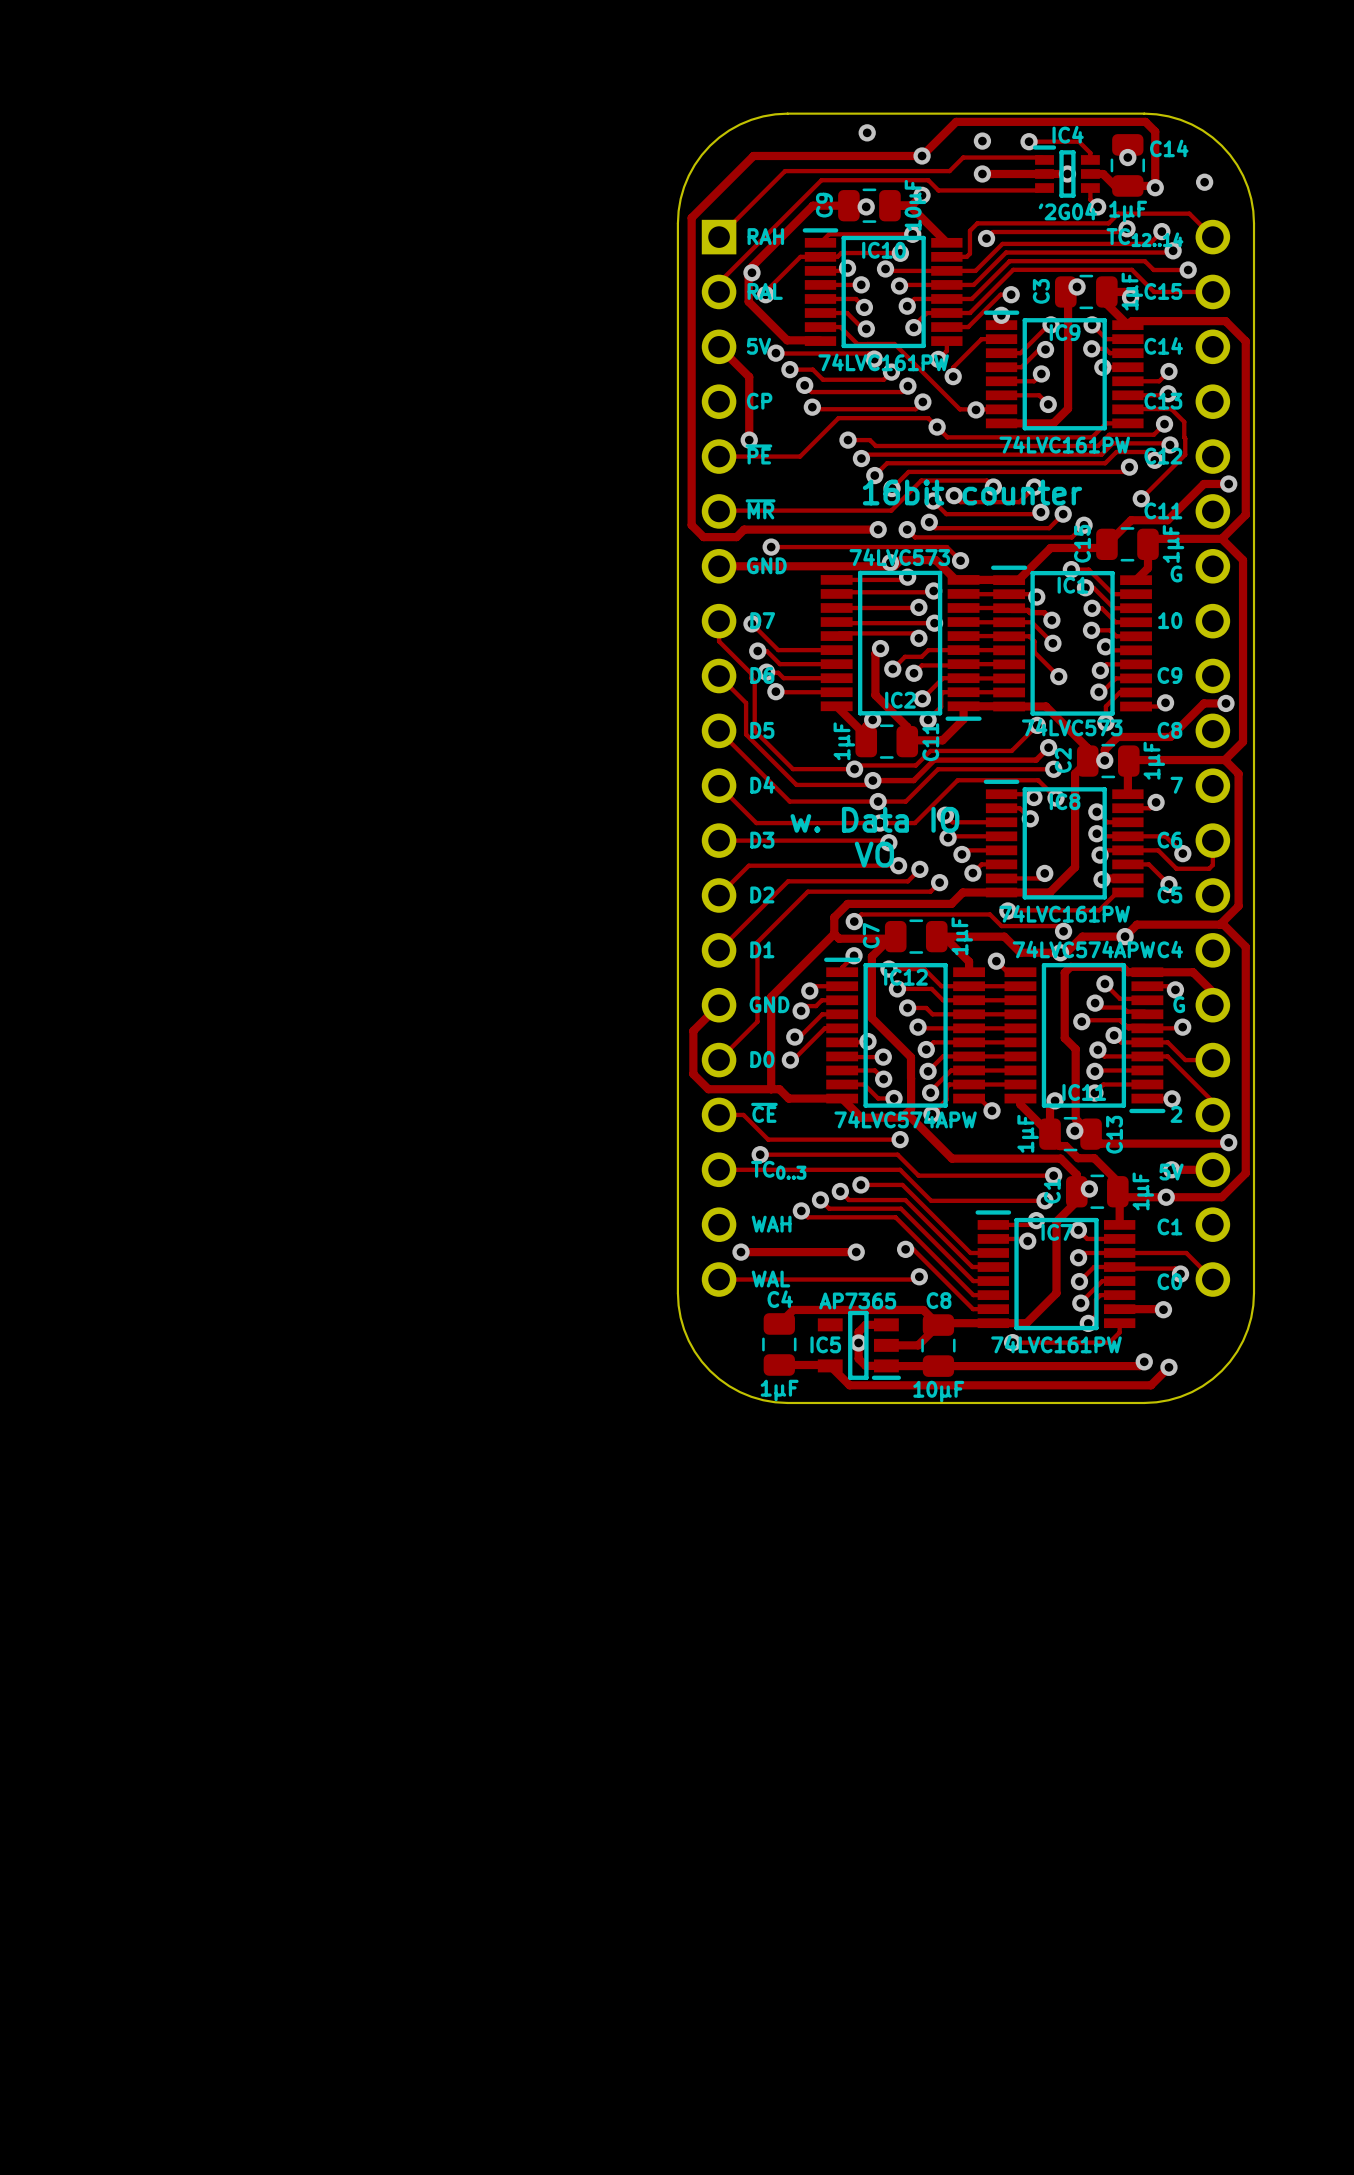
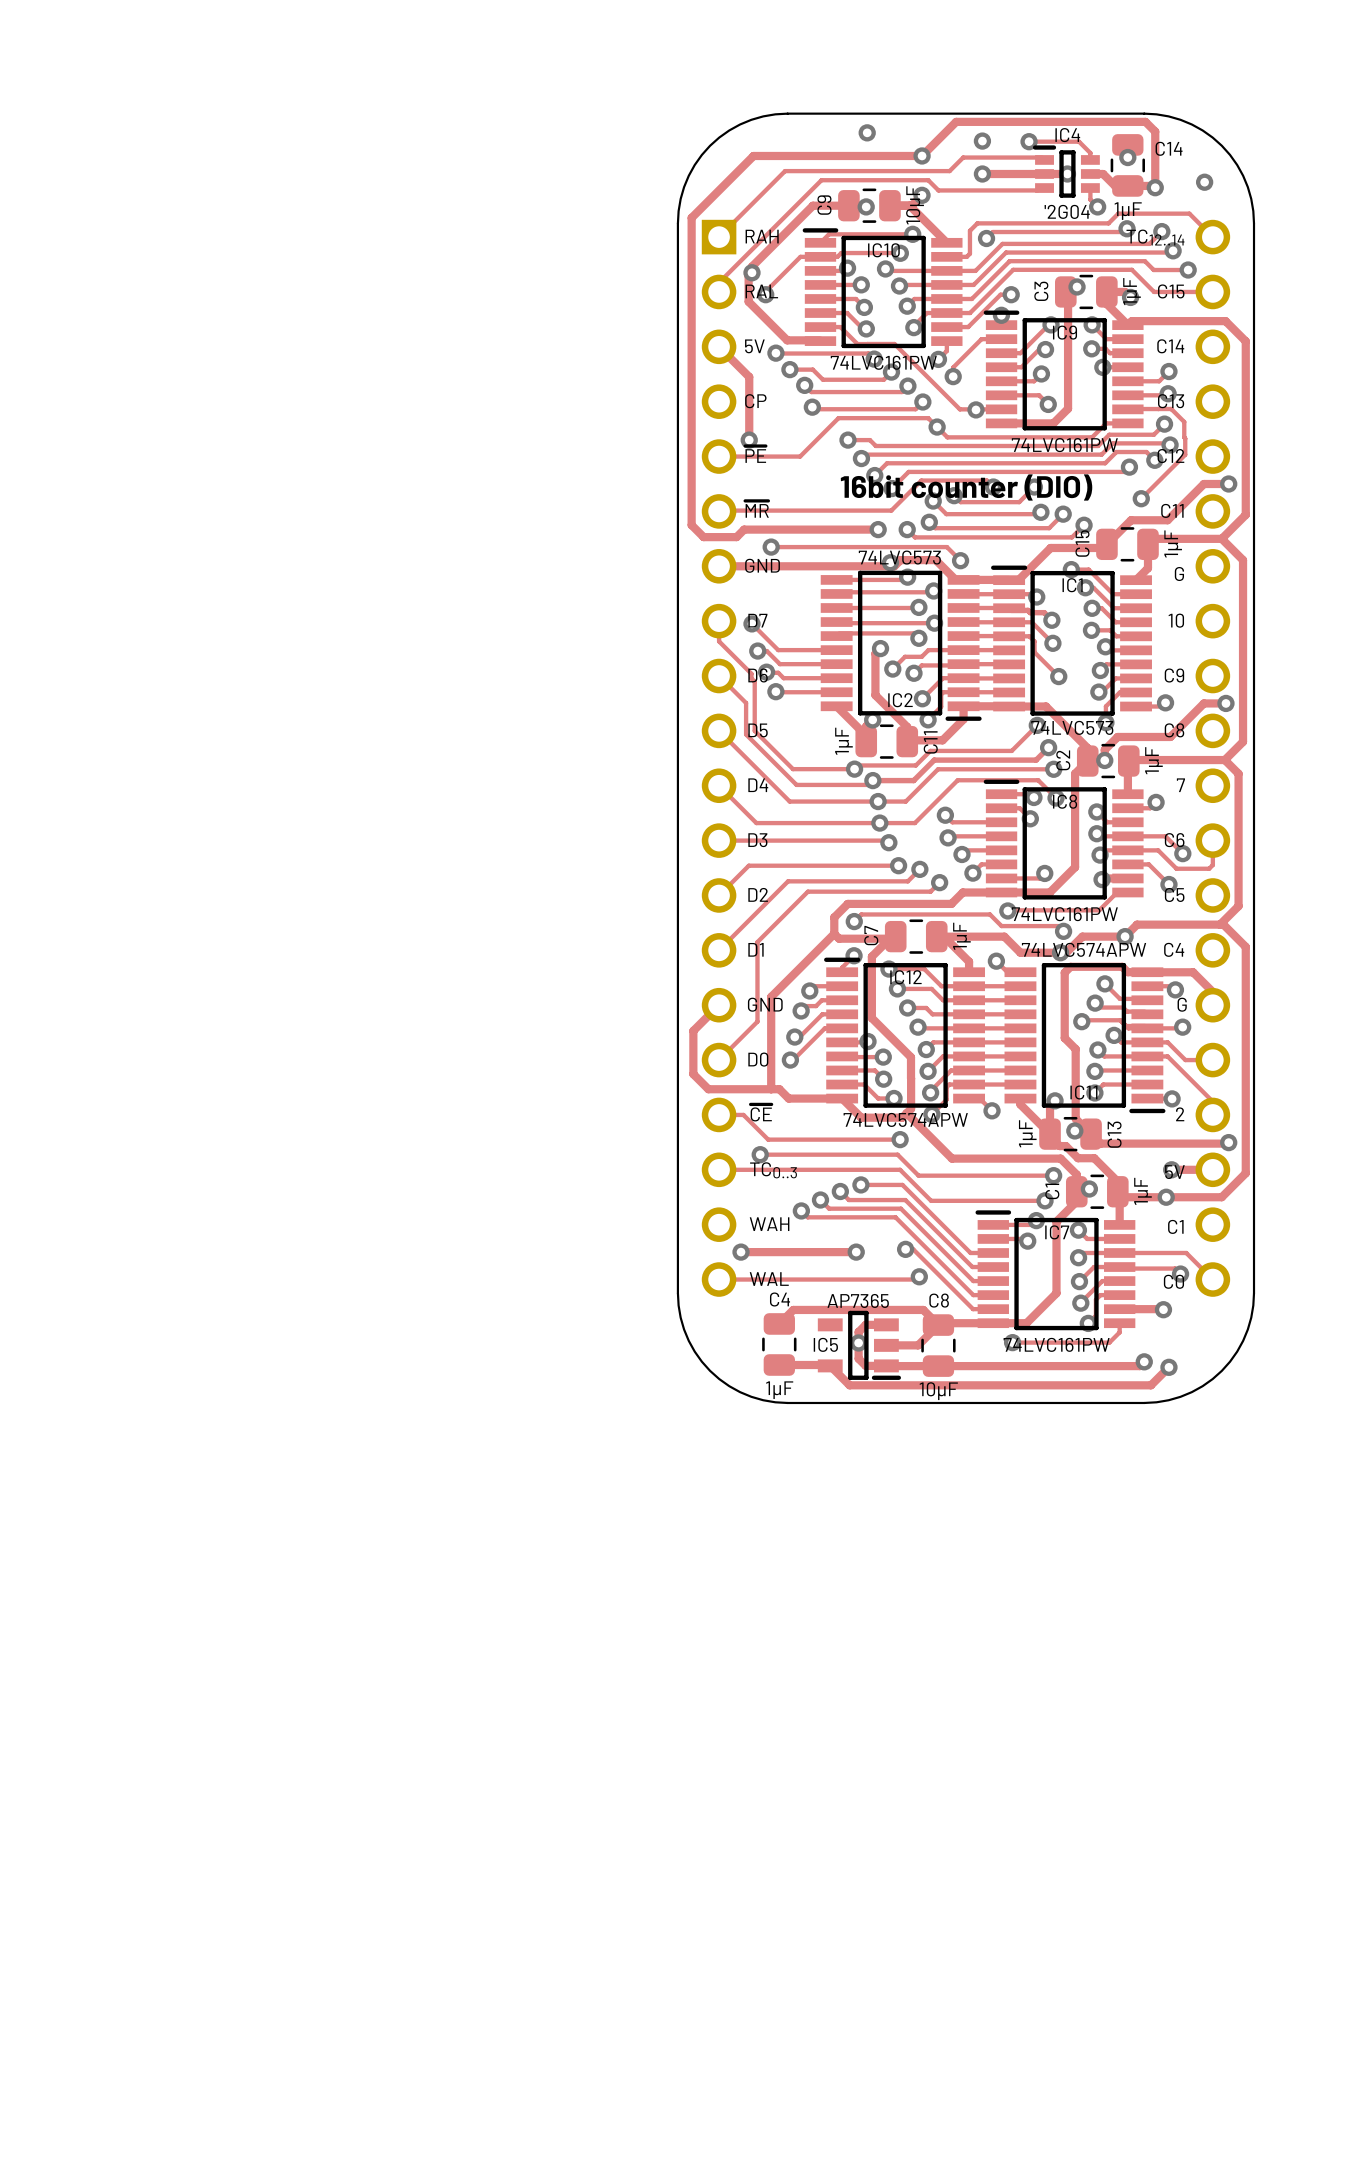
text: 16bit counter (972, 492) -> 16bit counter (DIO) (966, 487)
text: w. Data IO (874, 819) -> none
text: VO (874, 854) -> none

